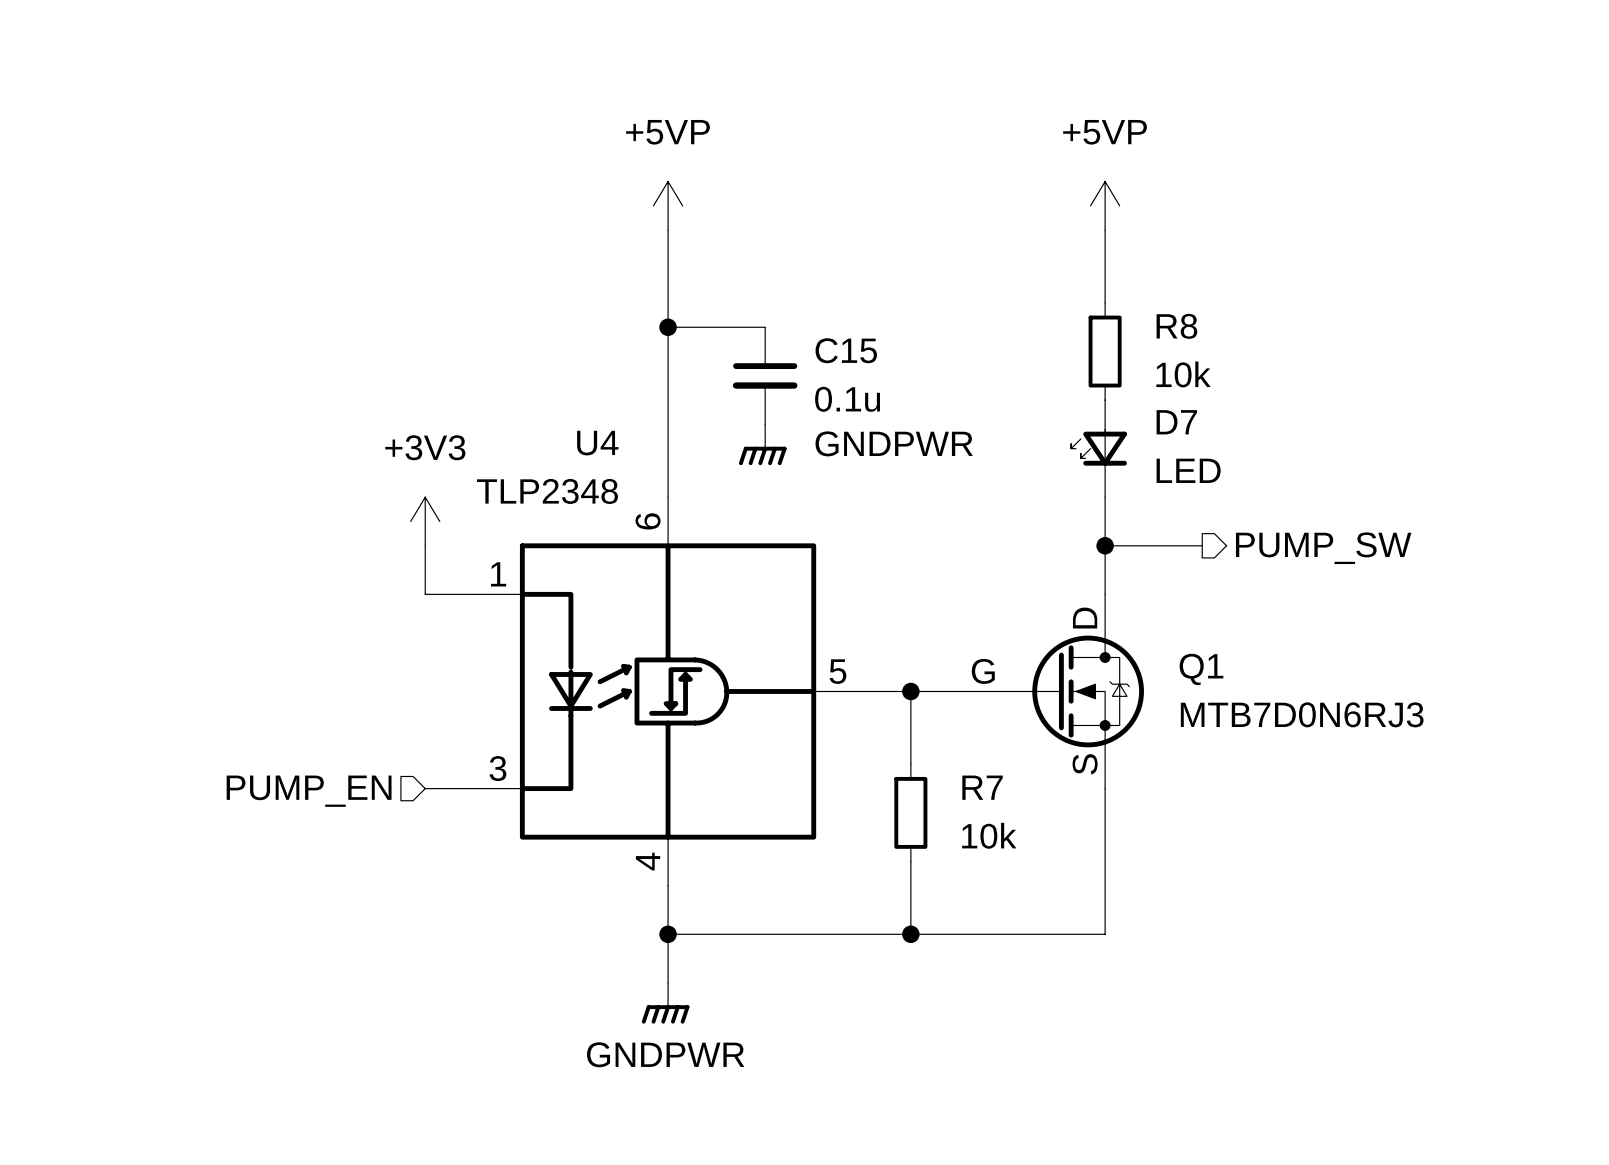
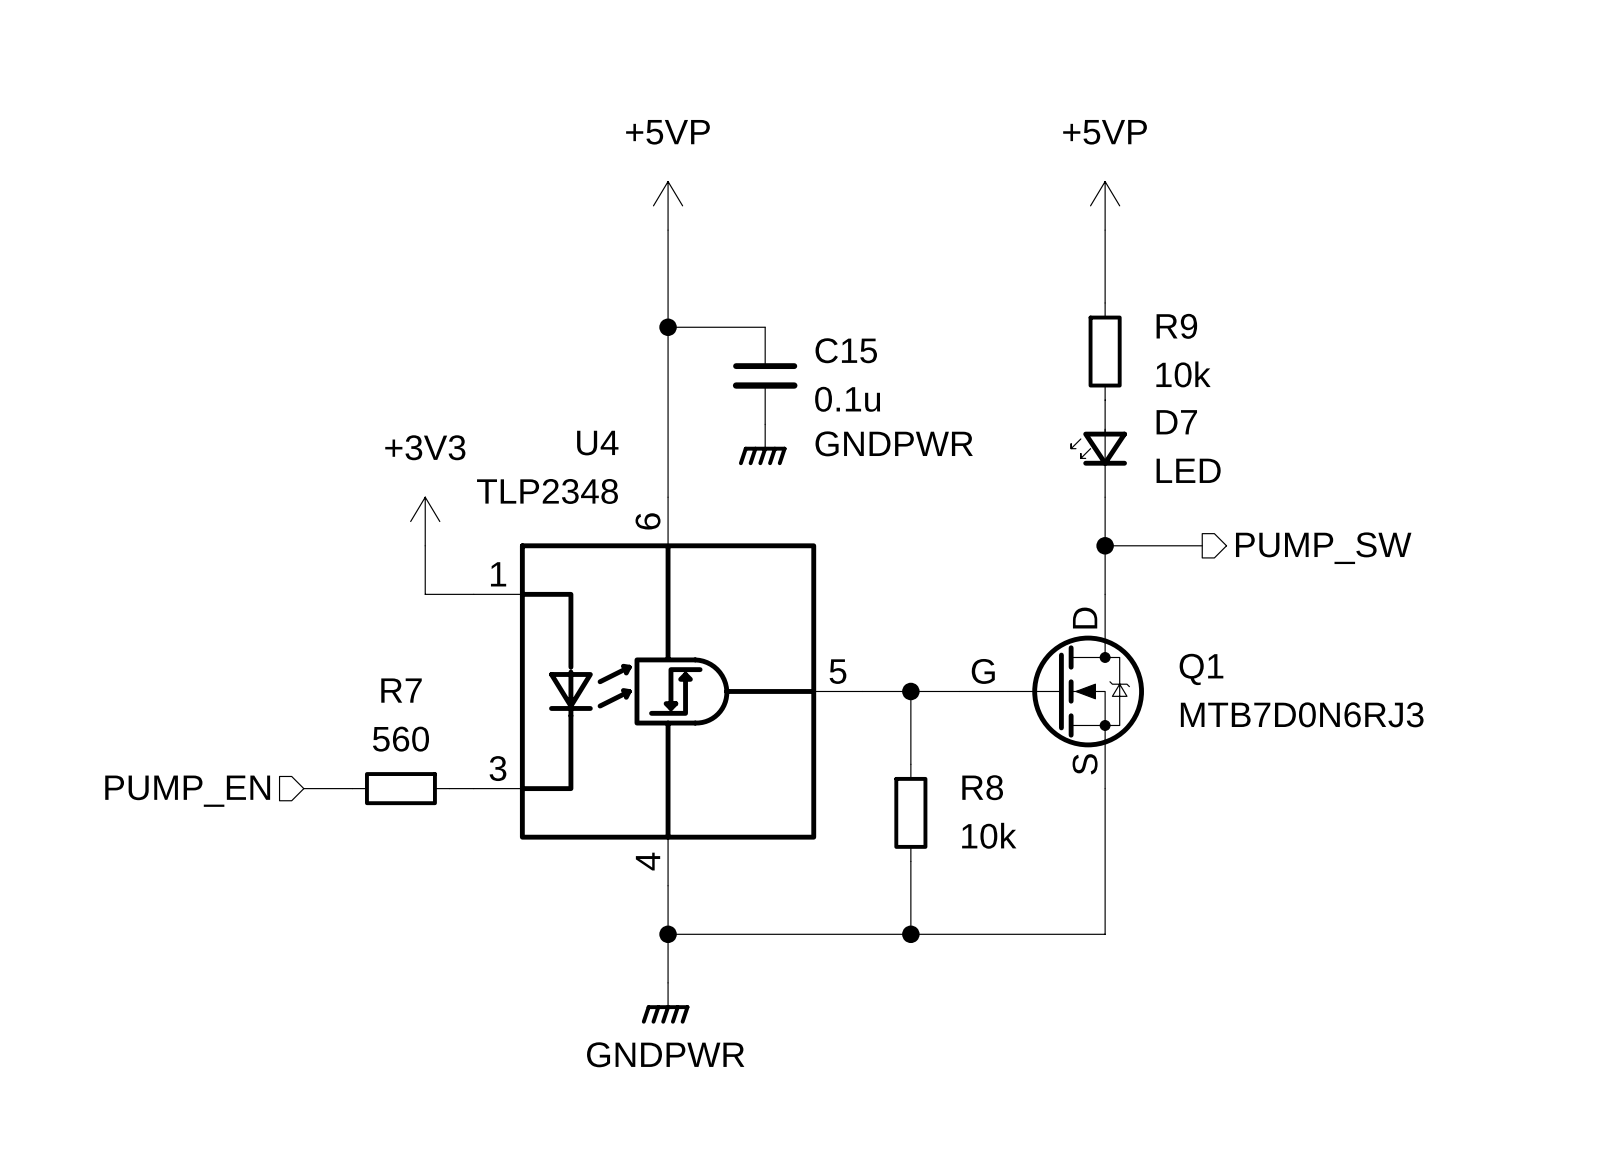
R8 name: R8 (1176, 326) -> R9 (1176, 326)
R7 name: R7 (982, 787) -> R8 (982, 787)
wire: none -> (303, 788) (352, 788)
R7: none -> 560 (400, 788)
hierarchical label position: PUMP_EN (309, 791) -> PUMP_EN (187, 791)

